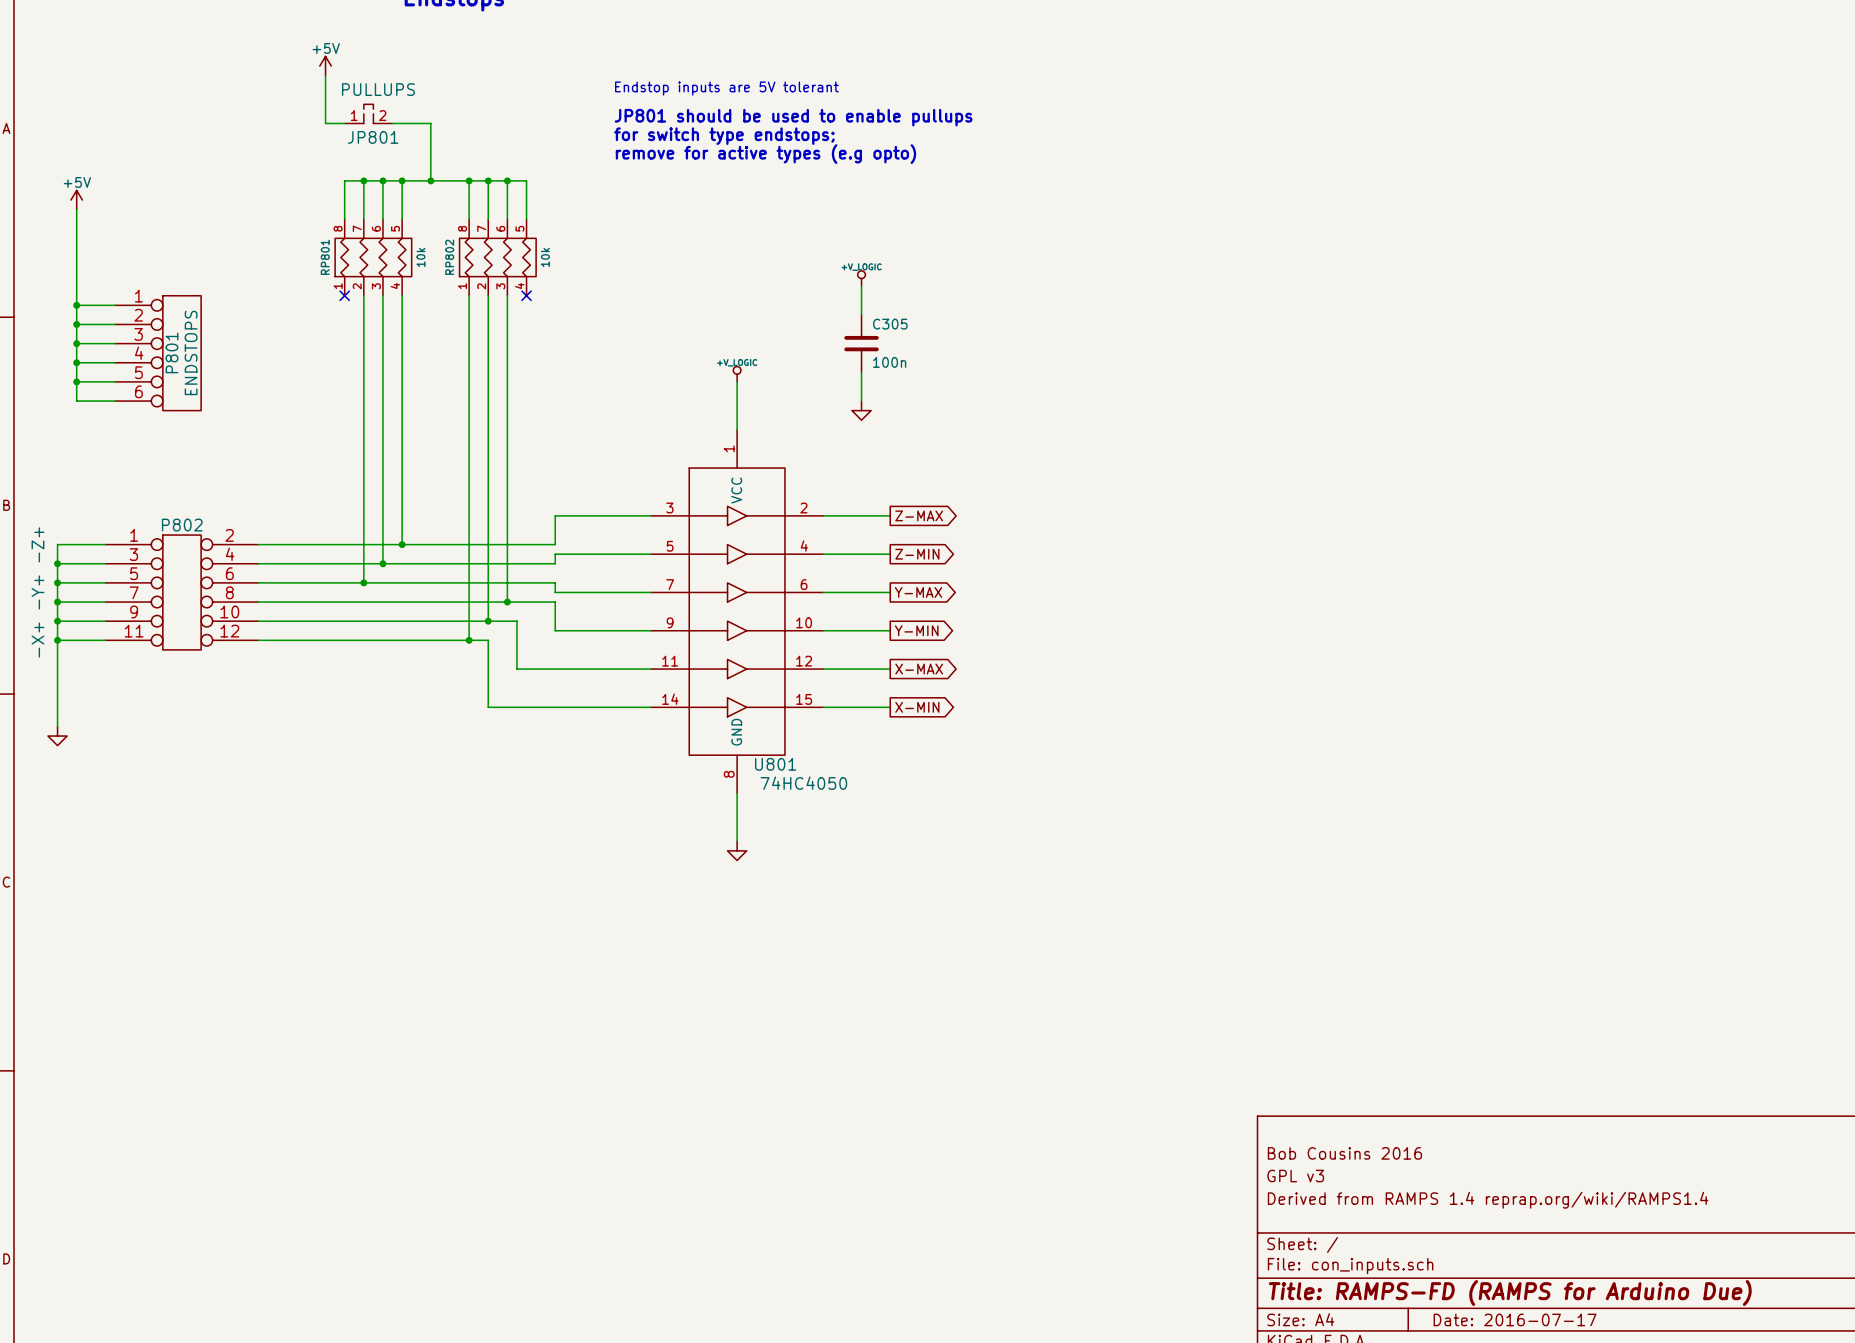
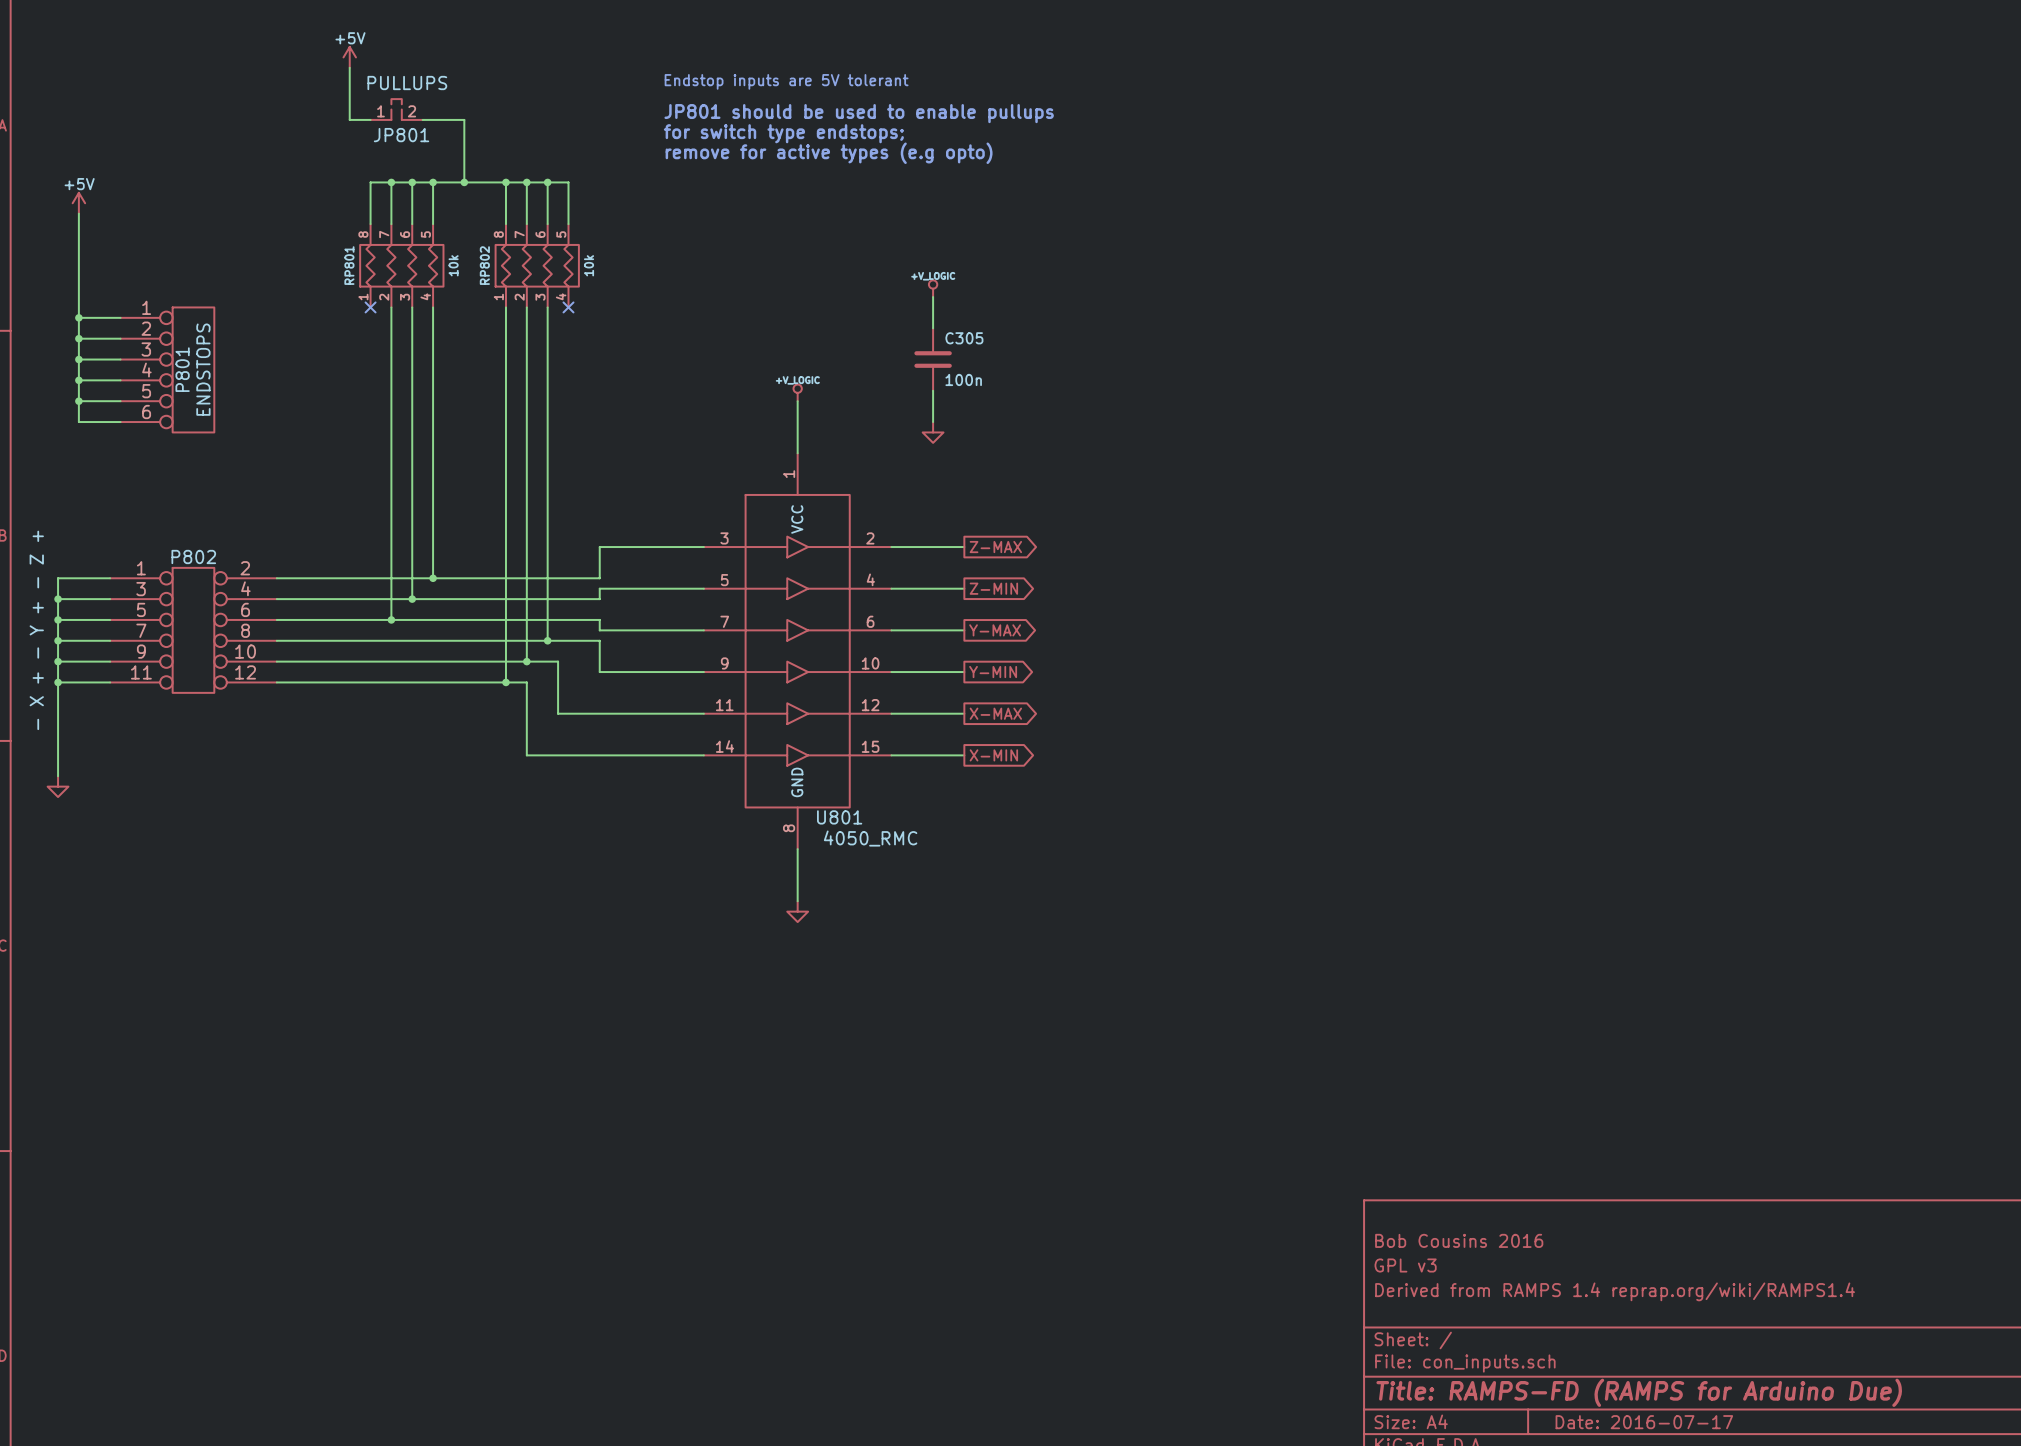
P802 value: -X+ -Y+ -Z+ (37, 592) -> - X + - Y + - Z + (36, 630)
U801 value: 74HC4050 (803, 783) -> 4050_RMC (870, 838)

